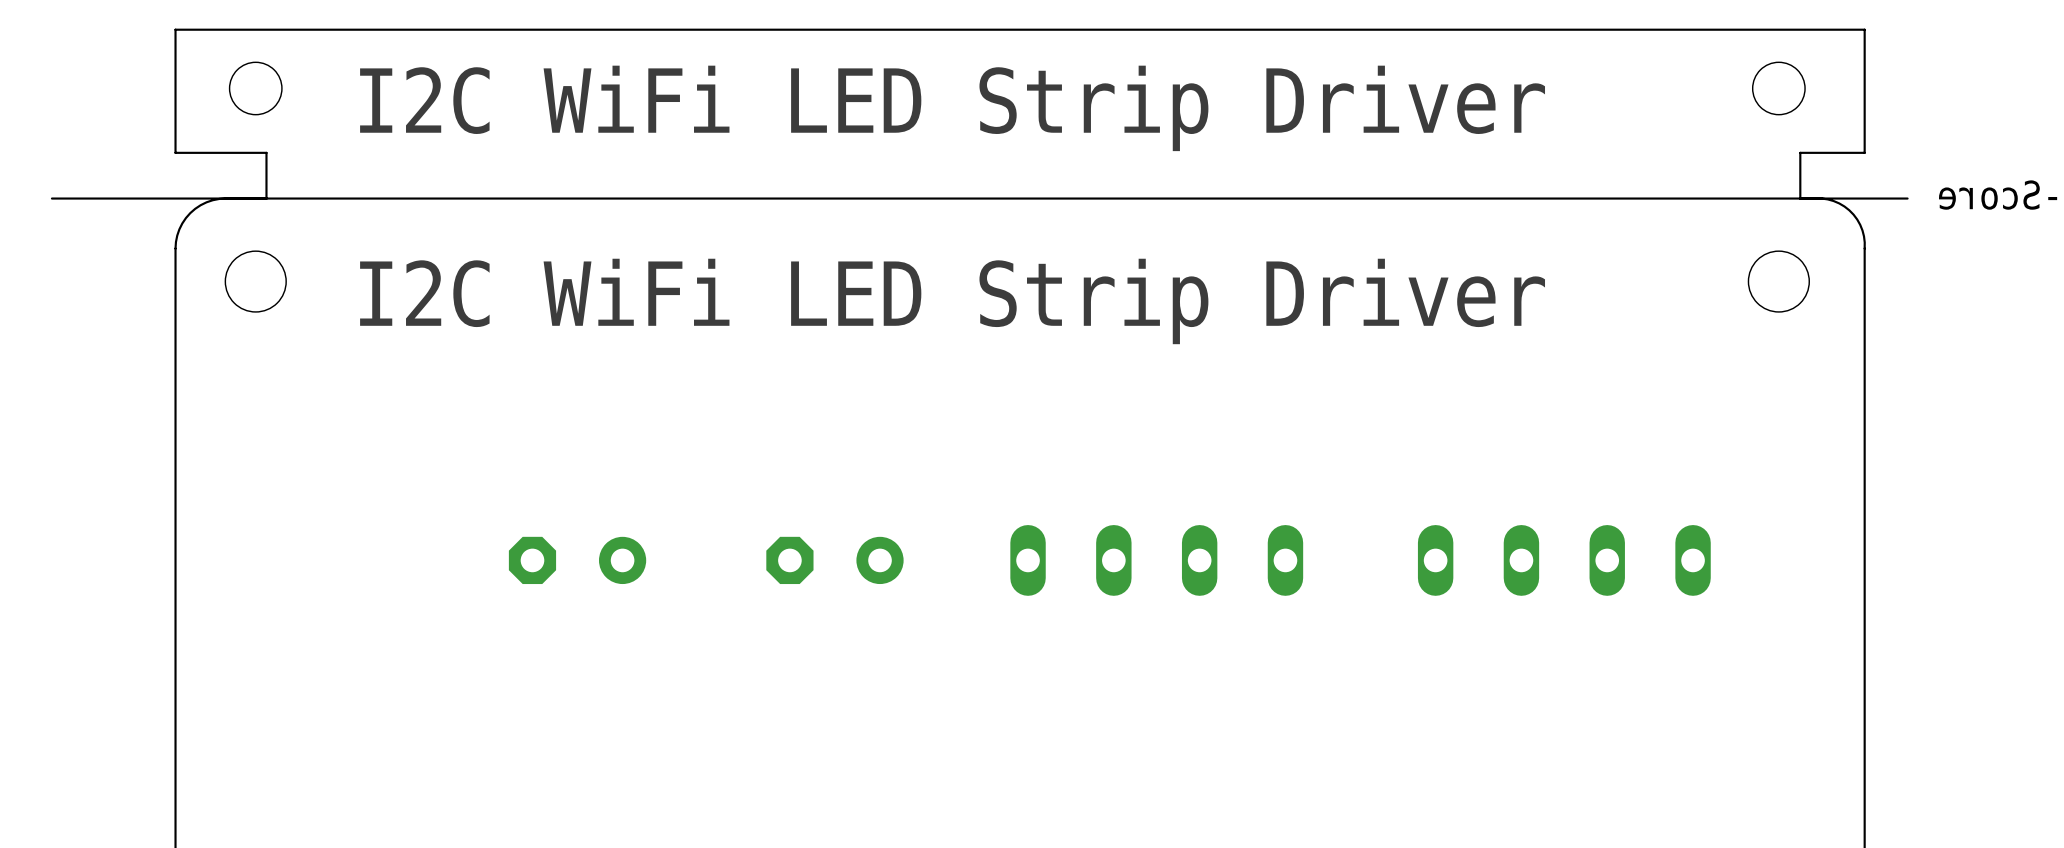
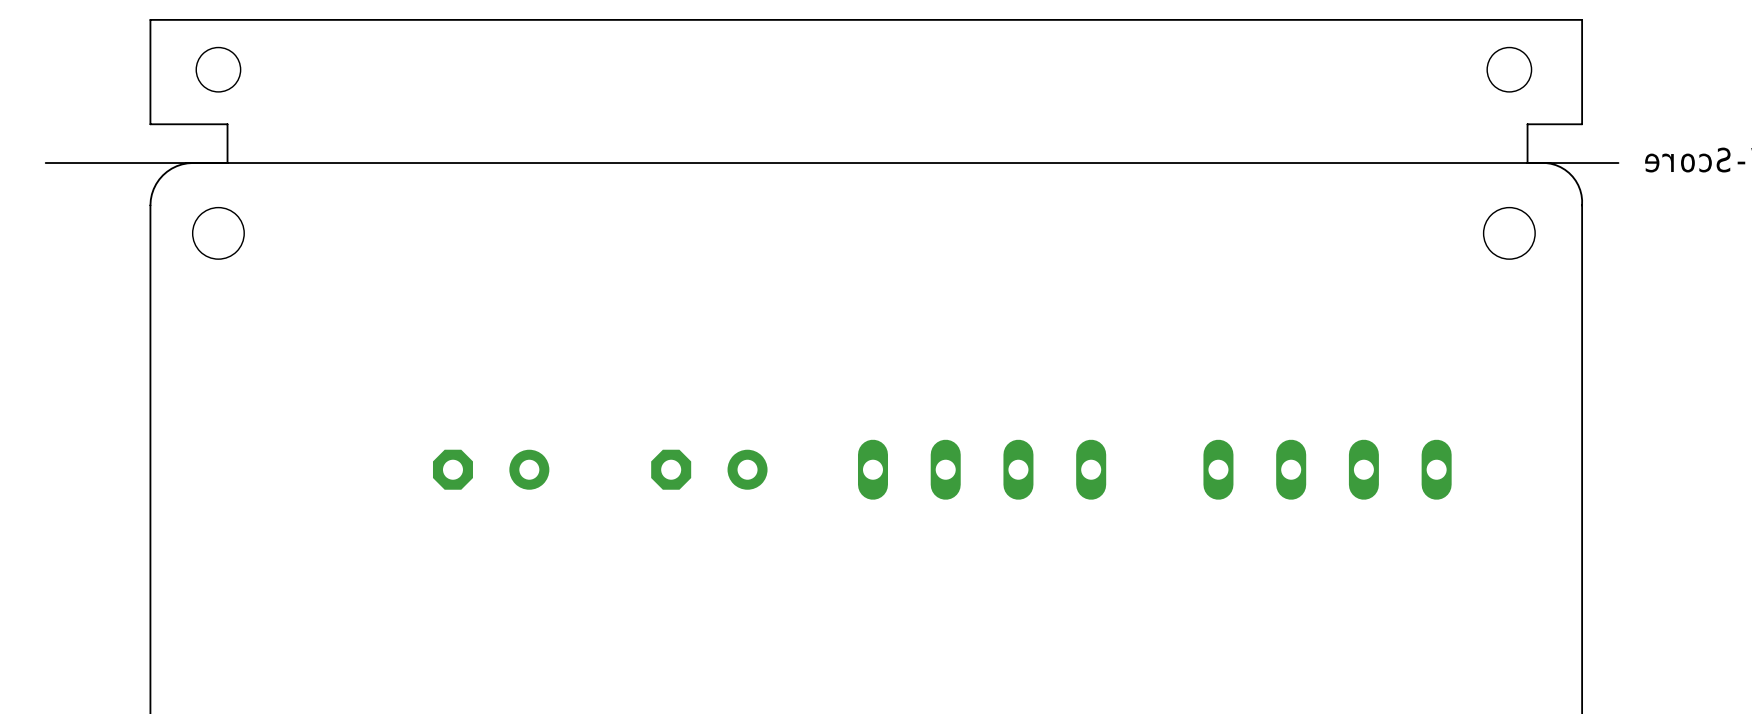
text: I2C WiFi LED Strip Driver (952, 108) -> none
text: I2C WiFi LED Strip Driver (952, 301) -> none

